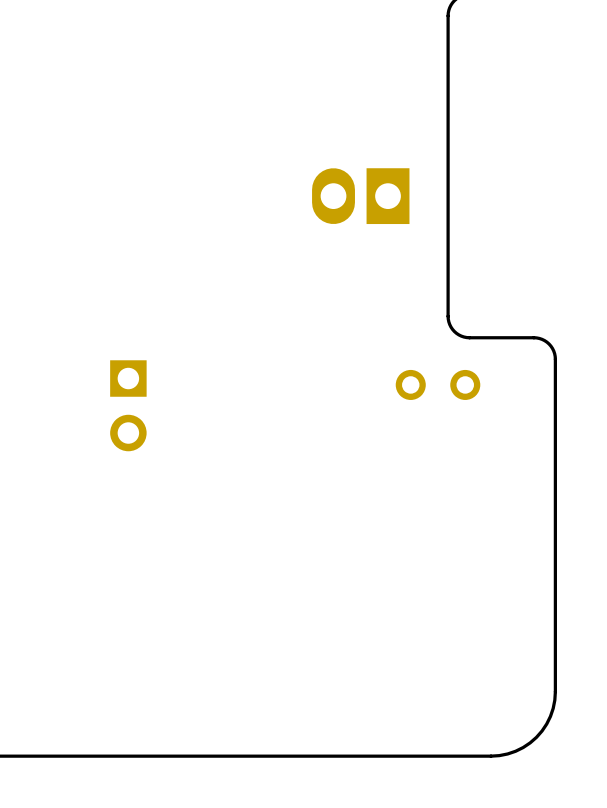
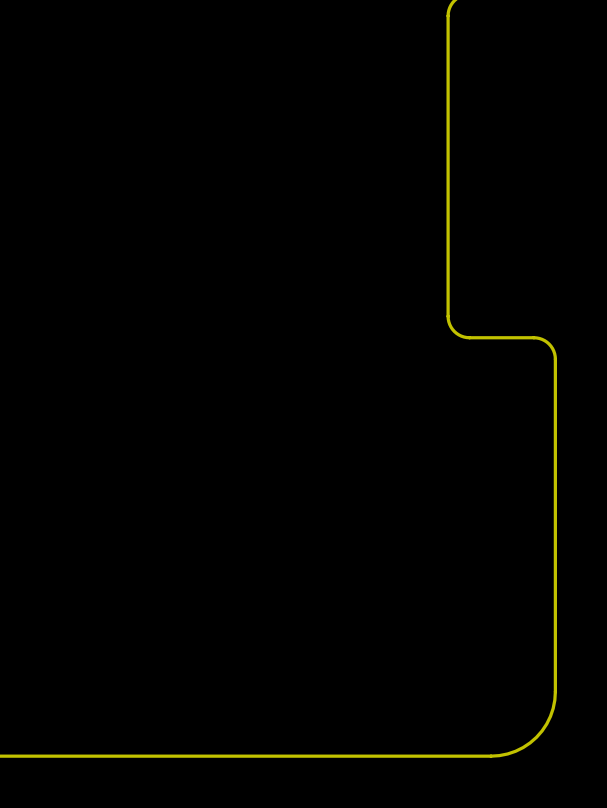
part: (360, 196) -> none
part: (438, 384) -> none
part: (128, 405) -> none

